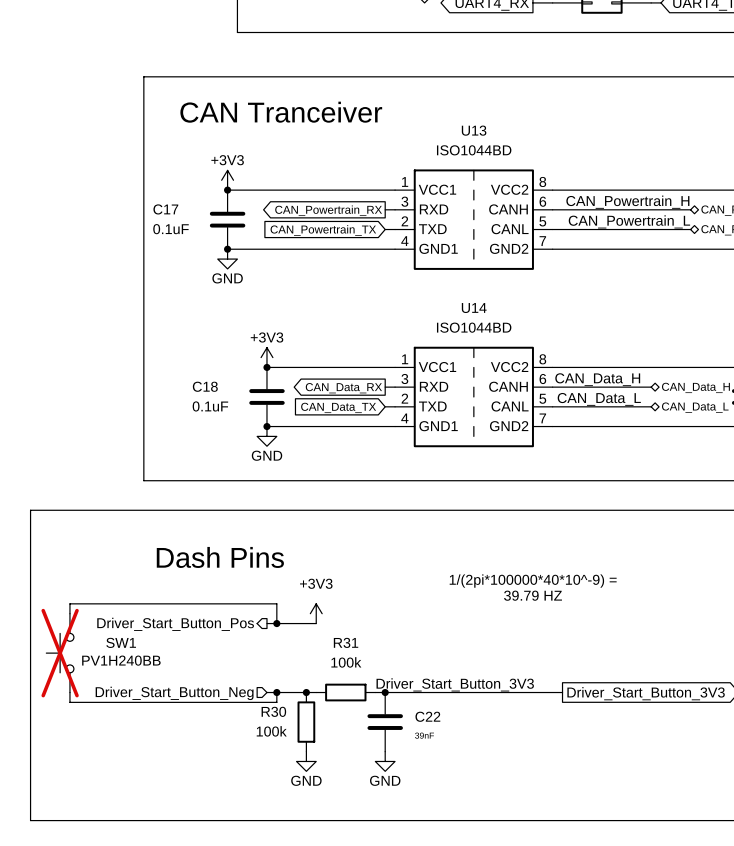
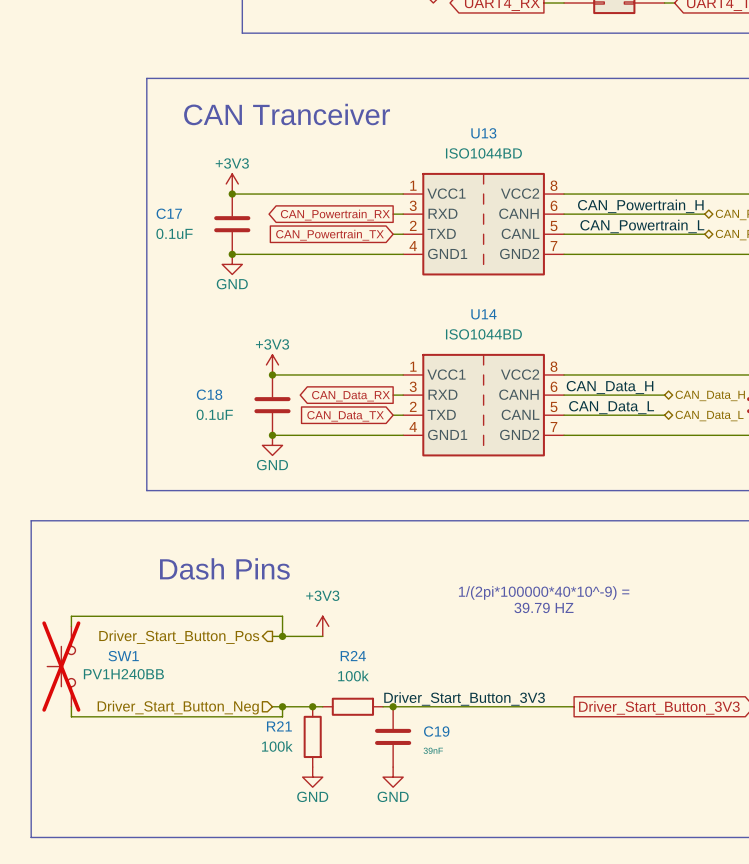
R31 name: R31 (346, 642) -> R24 (353, 656)
R30 name: R30 (273, 711) -> R21 (279, 726)
C22 name: C22 (427, 716) -> C19 (436, 731)

